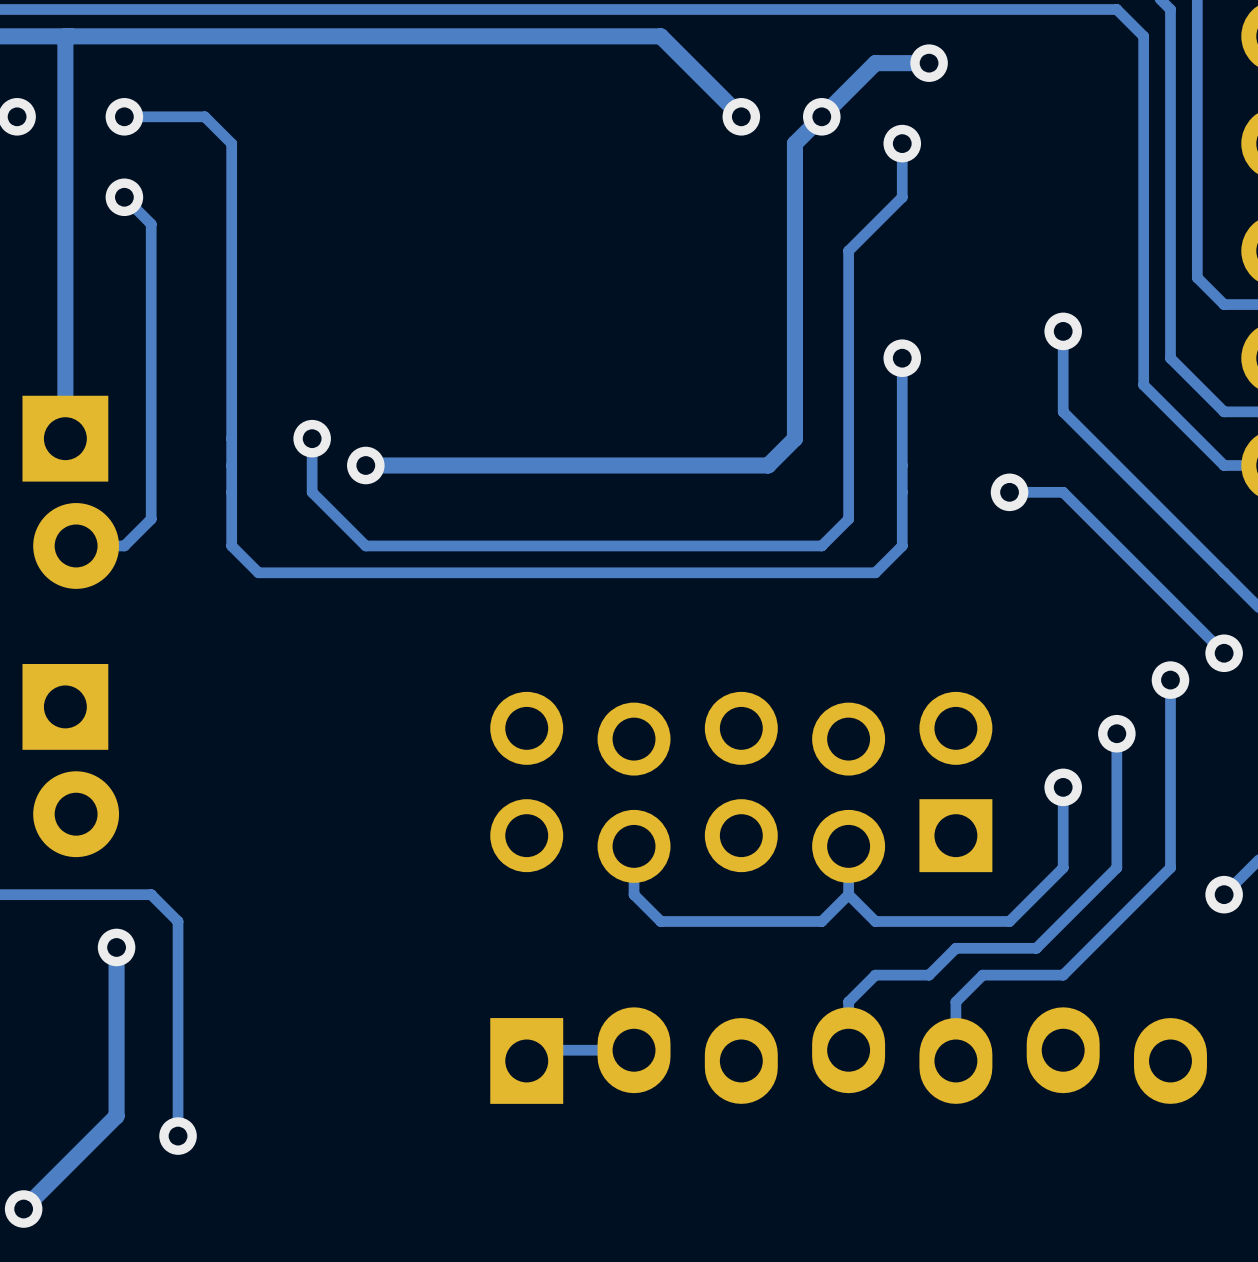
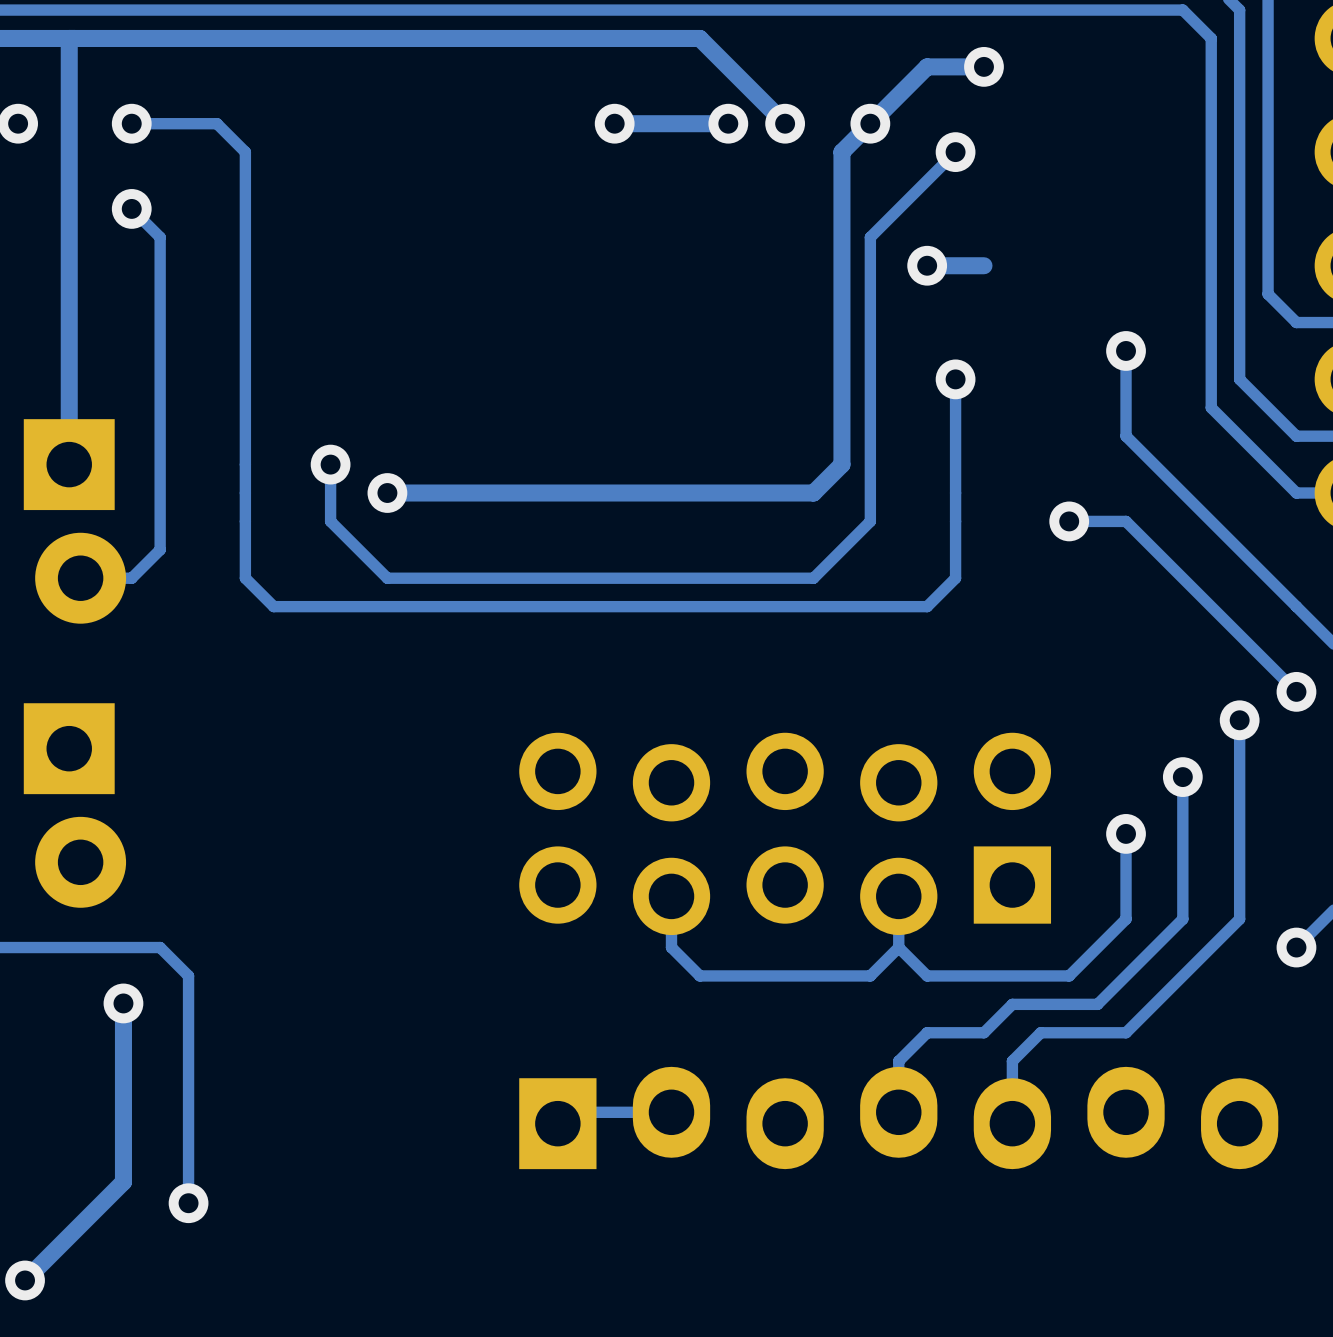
via: none -> (614, 123)
track: none -> (728, 123) (614, 123)
via: none -> (728, 123)
track: (902, 143) (902, 197) (848, 250) (848, 519) (821, 545) (768, 545) -> (955, 152) (870, 237) (870, 521) (813, 578)
via: none -> (927, 265)
track: none -> (983, 265) (927, 265)

